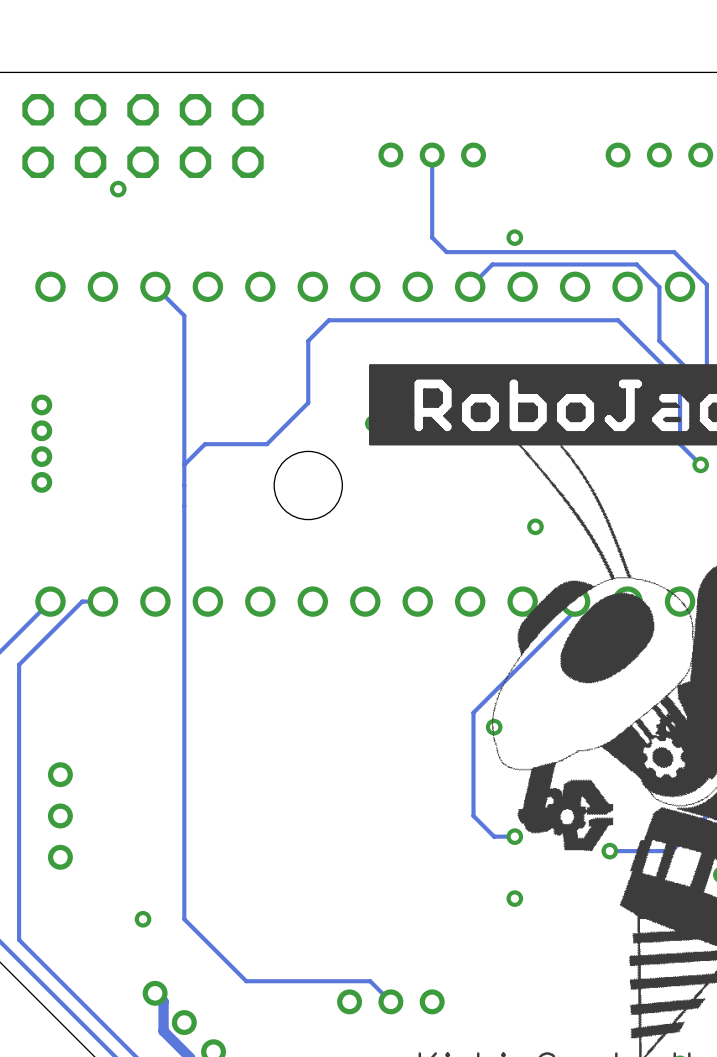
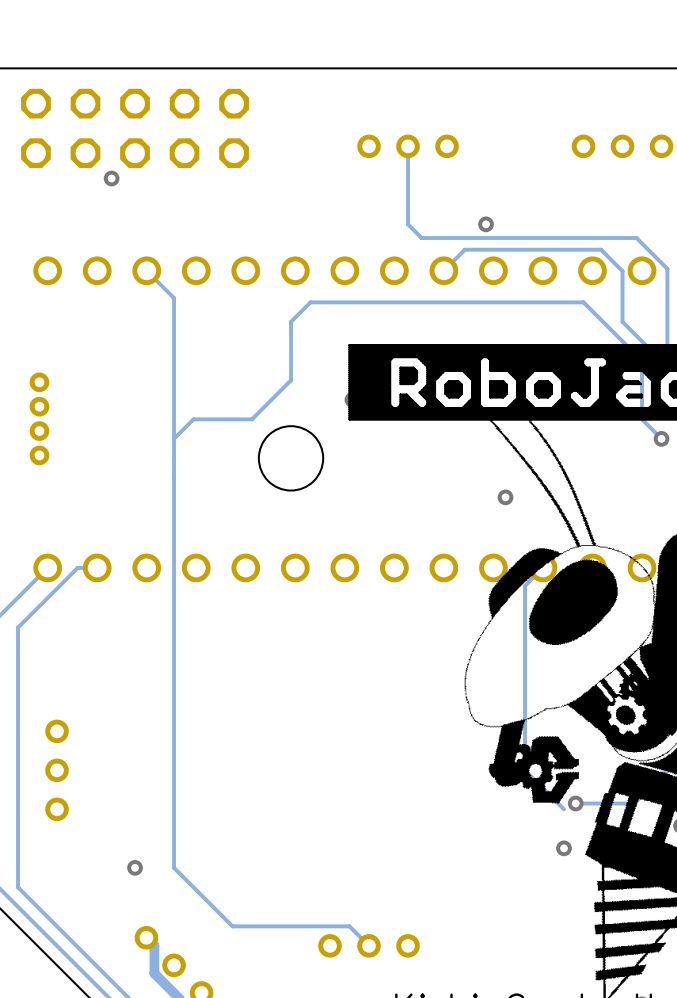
track: (575, 601) (575, 611) (473, 712) (473, 815) (494, 836) (514, 836) -> (542, 567) (525, 585) (525, 770) (564, 809)
via: (494, 727) -> none
via: (514, 836) -> none
via: (514, 898) -> none
via: none -> (564, 848)

